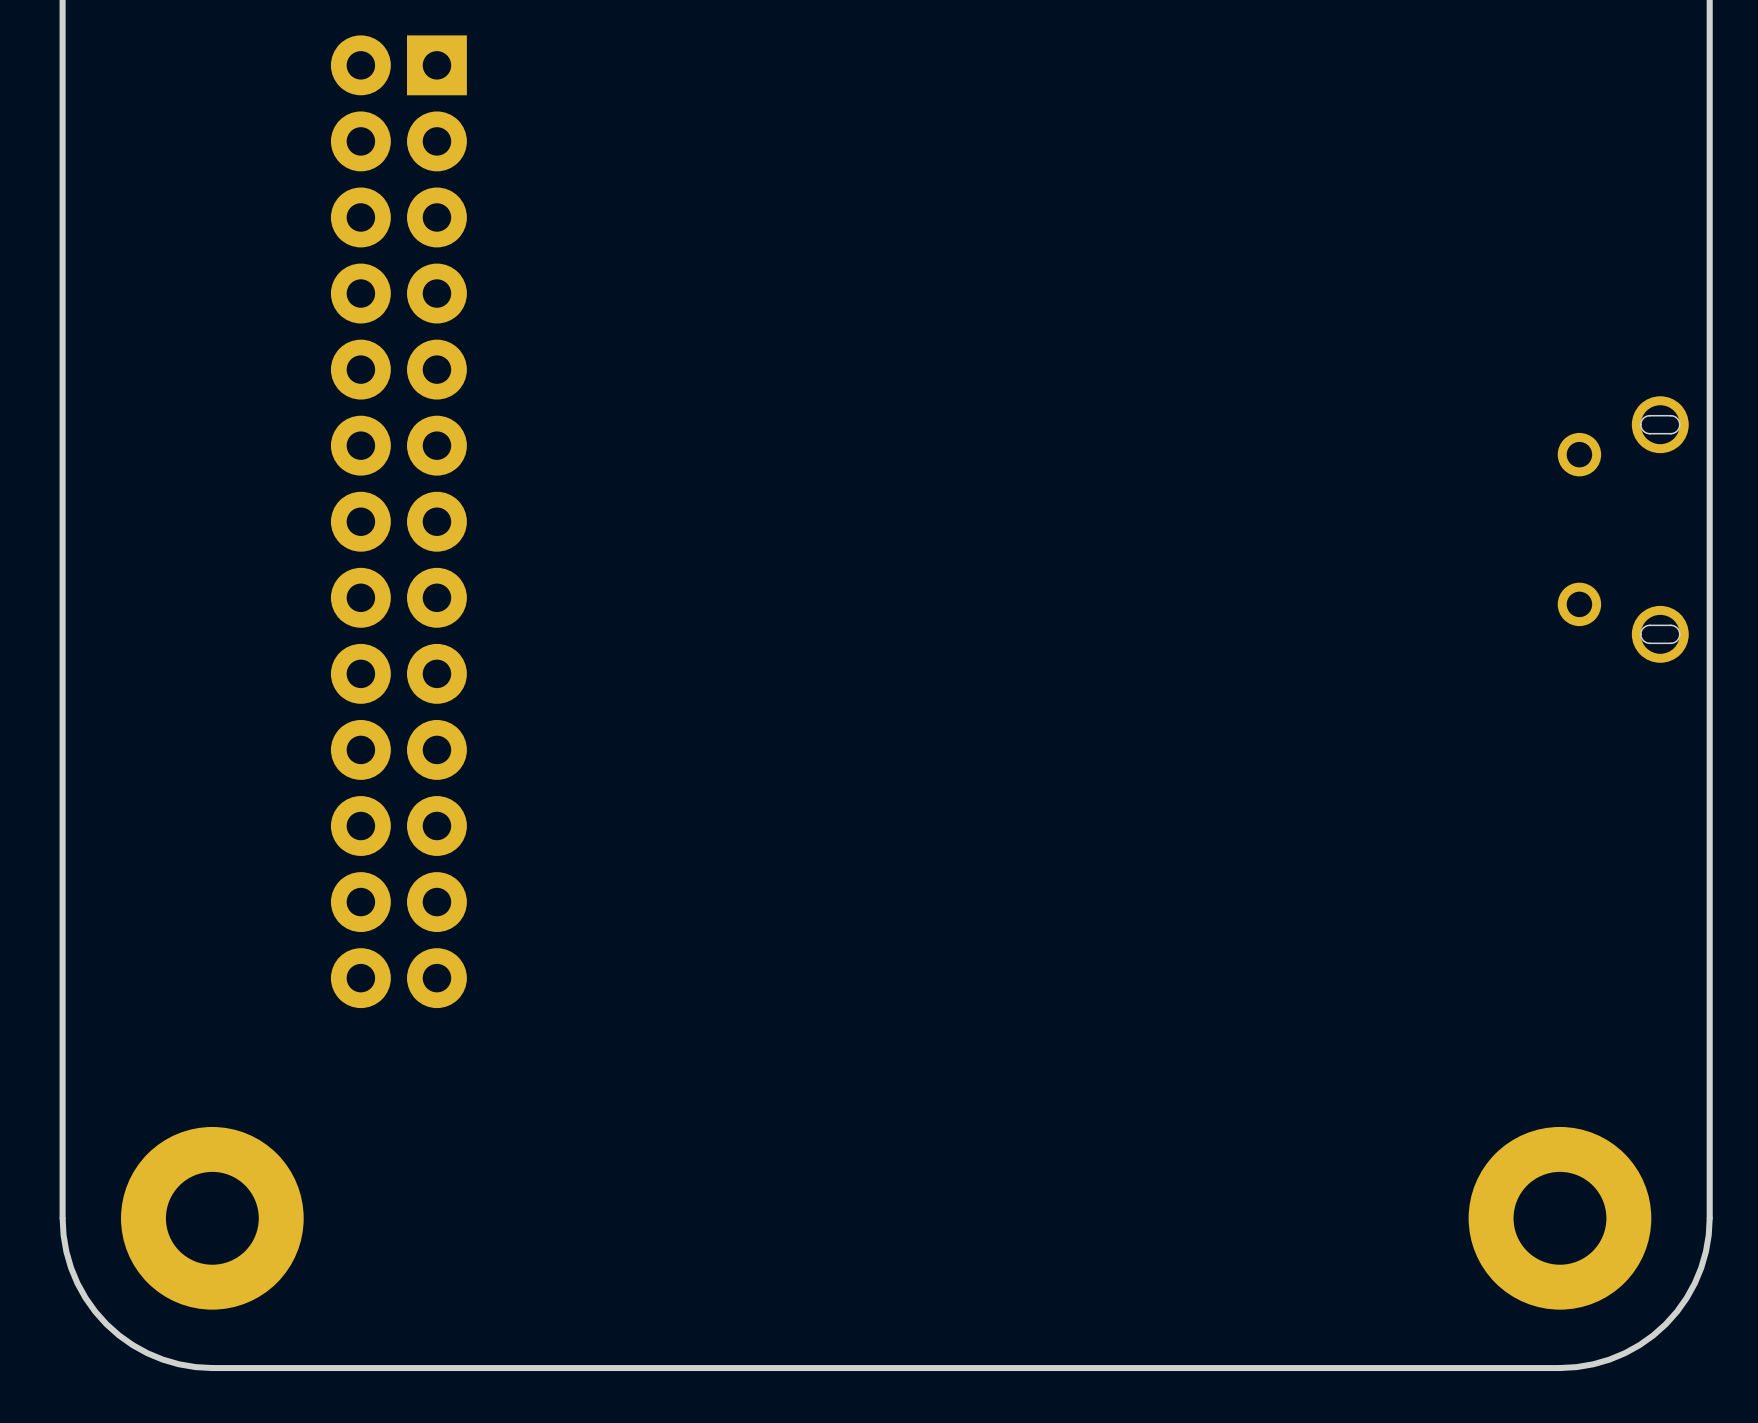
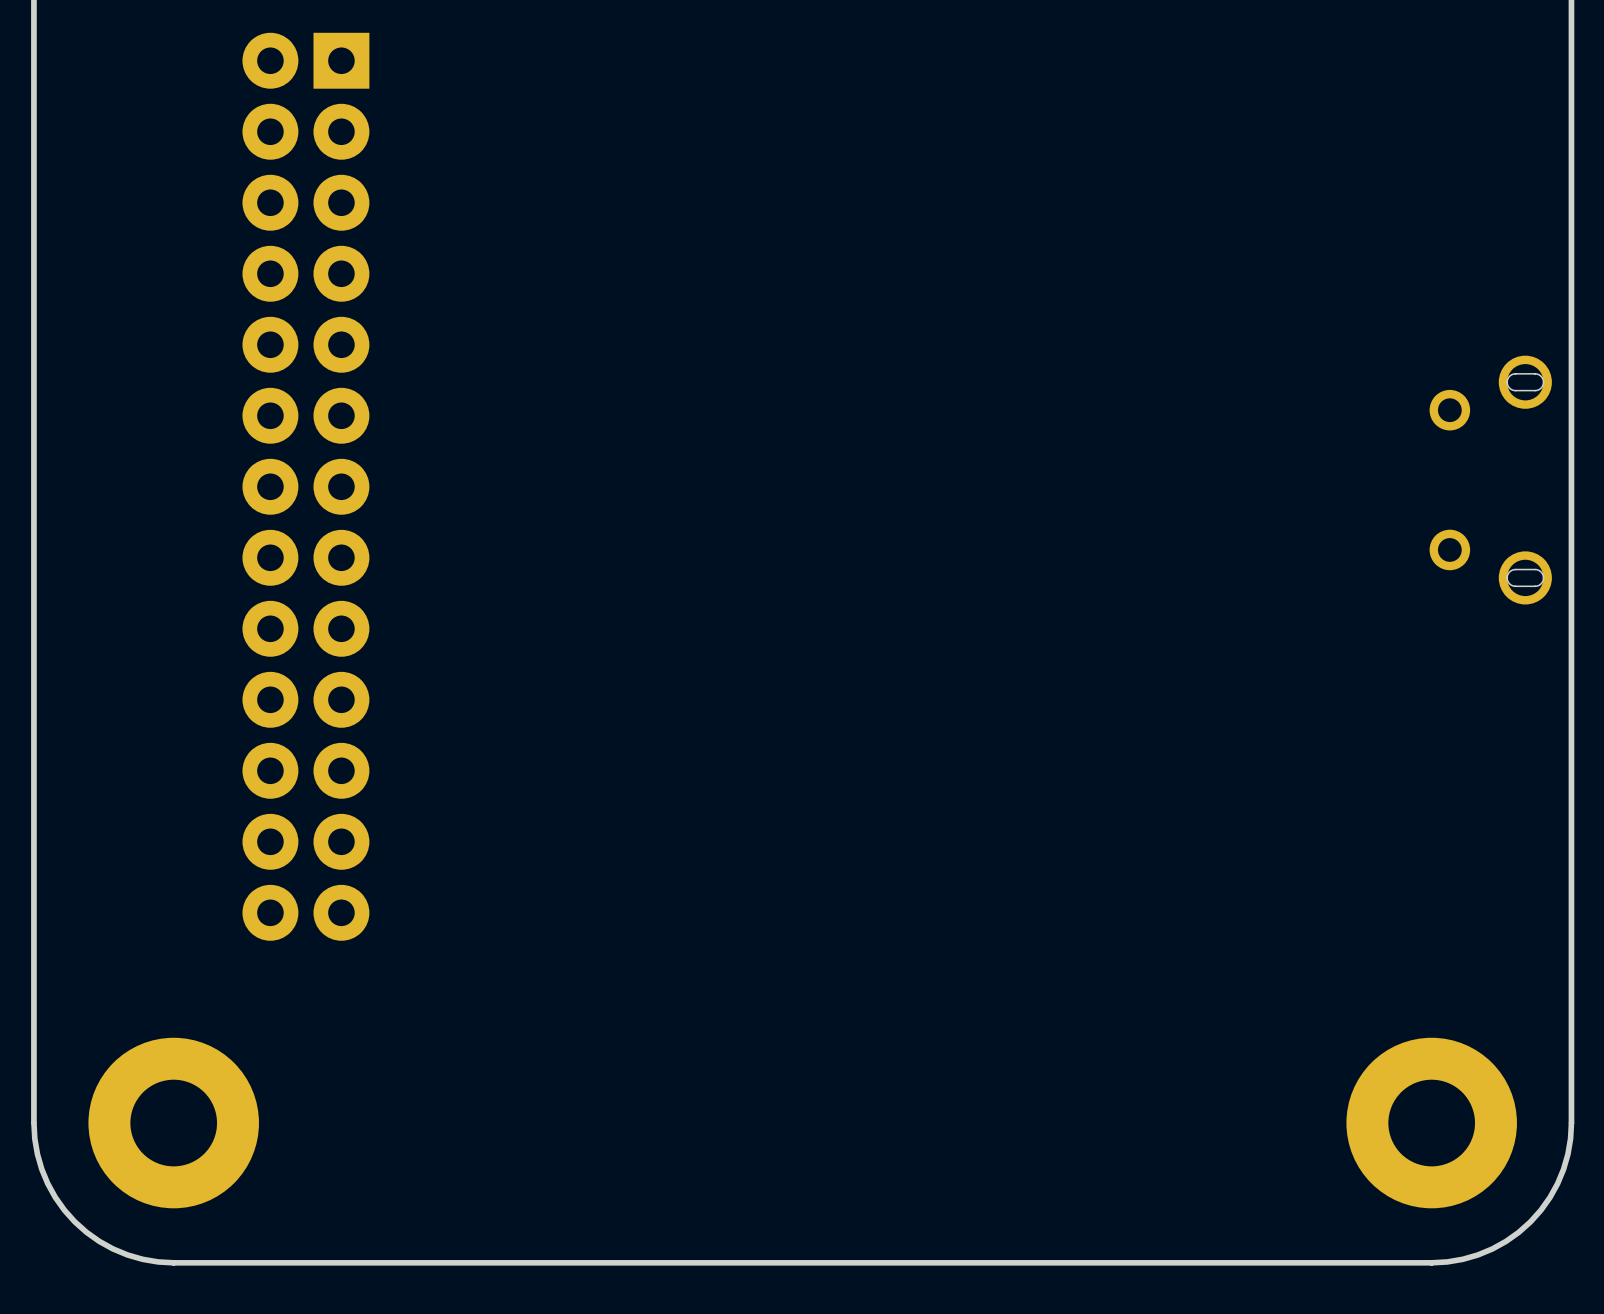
part position: (398, 521) -> (305, 486)

